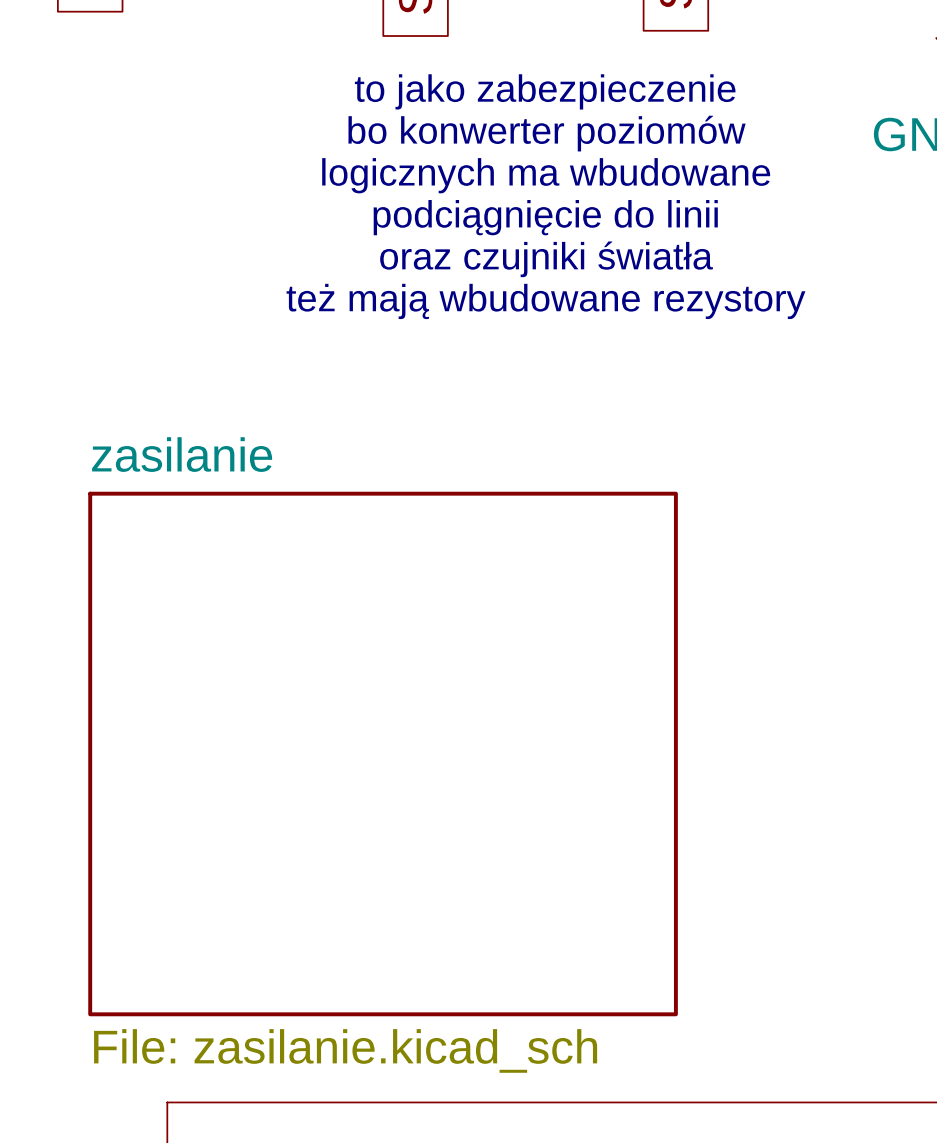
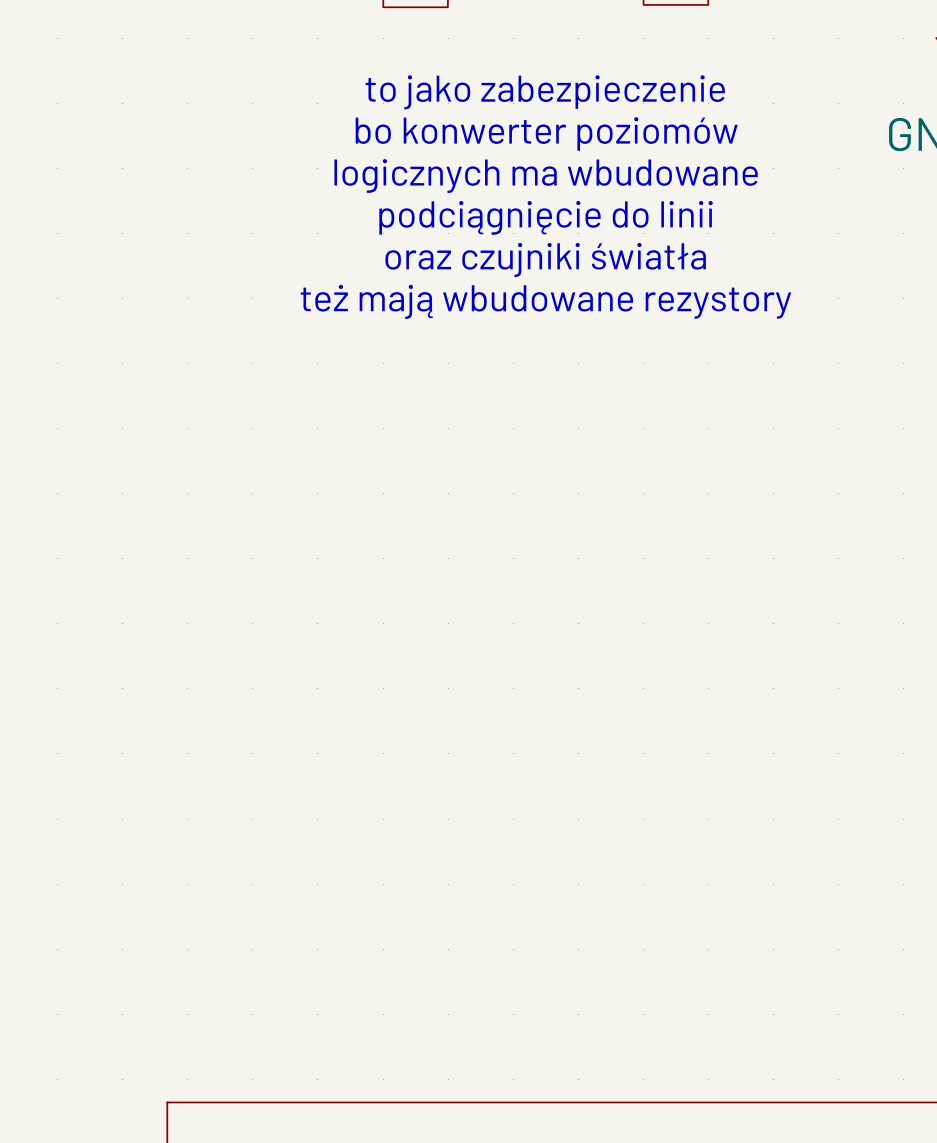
sheet zasilanie: File: zasilanie.kicad_sch (383, 753) -> none

